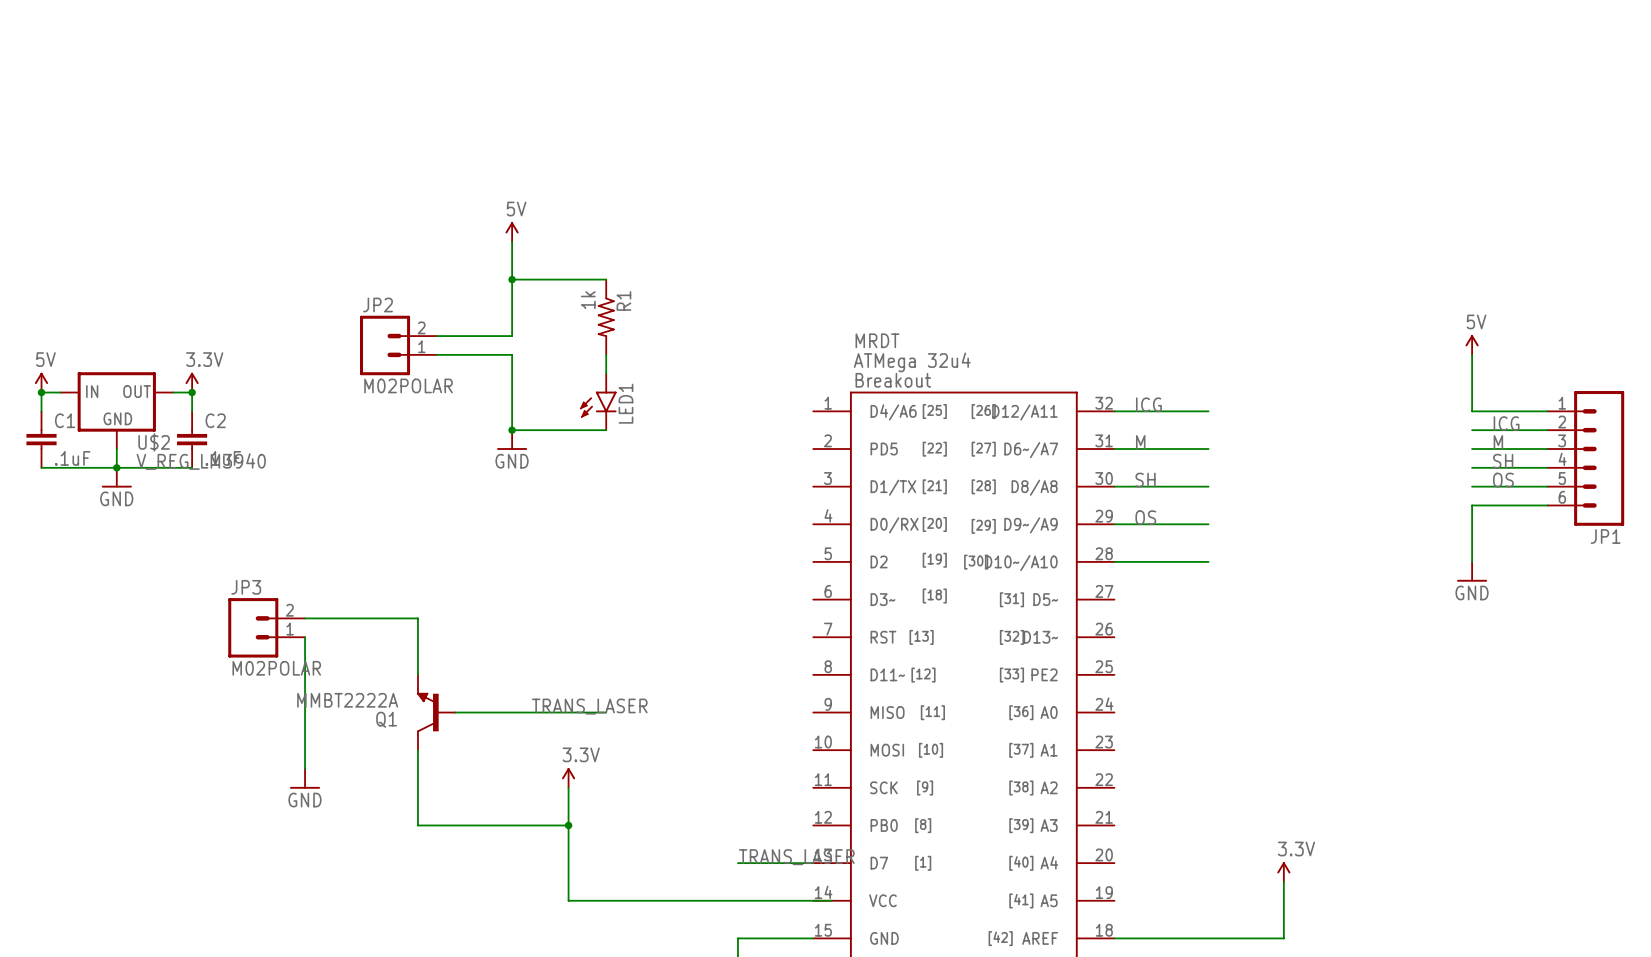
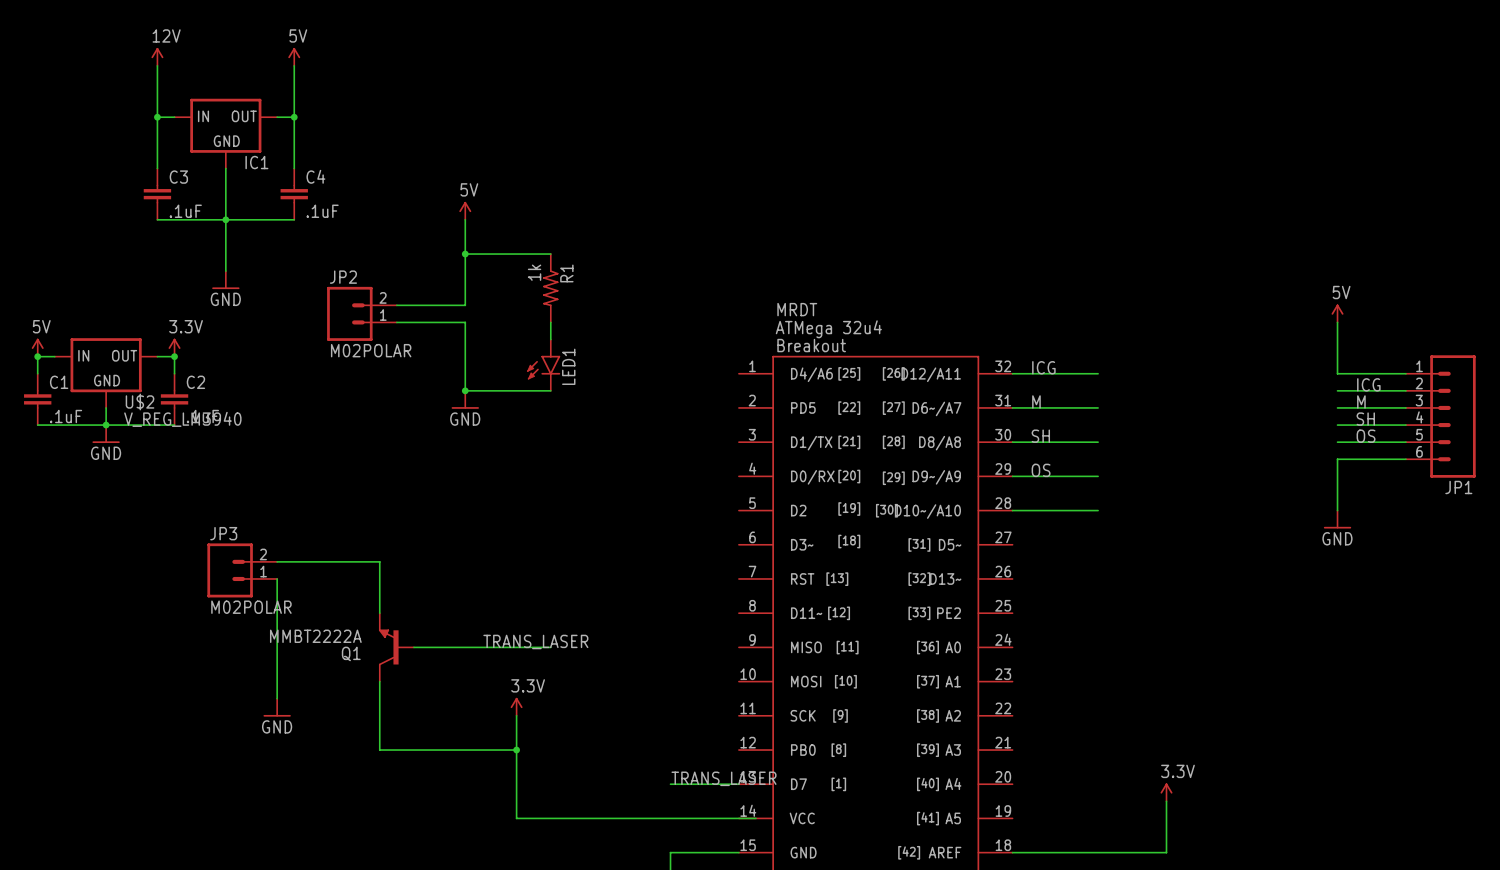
power symbol: none -> 12V (157, 56)
power symbol: none -> 5V (294, 56)
wire: none -> (157, 65) (157, 168)
wire: none -> (294, 65) (294, 168)
wire: none -> (157, 117) (174, 117)
junction: none -> (157, 117)
wire: none -> (277, 117) (294, 117)
junction: none -> (294, 117)
IC1: none -> (225, 133)
wire: none -> (225, 168) (225, 271)
C3: none -> .1uF (157, 194)
C4: none -> .1uF (294, 194)
wire: none -> (157, 219) (294, 219)
junction: none -> (225, 219)
power symbol: none -> GND (225, 280)

